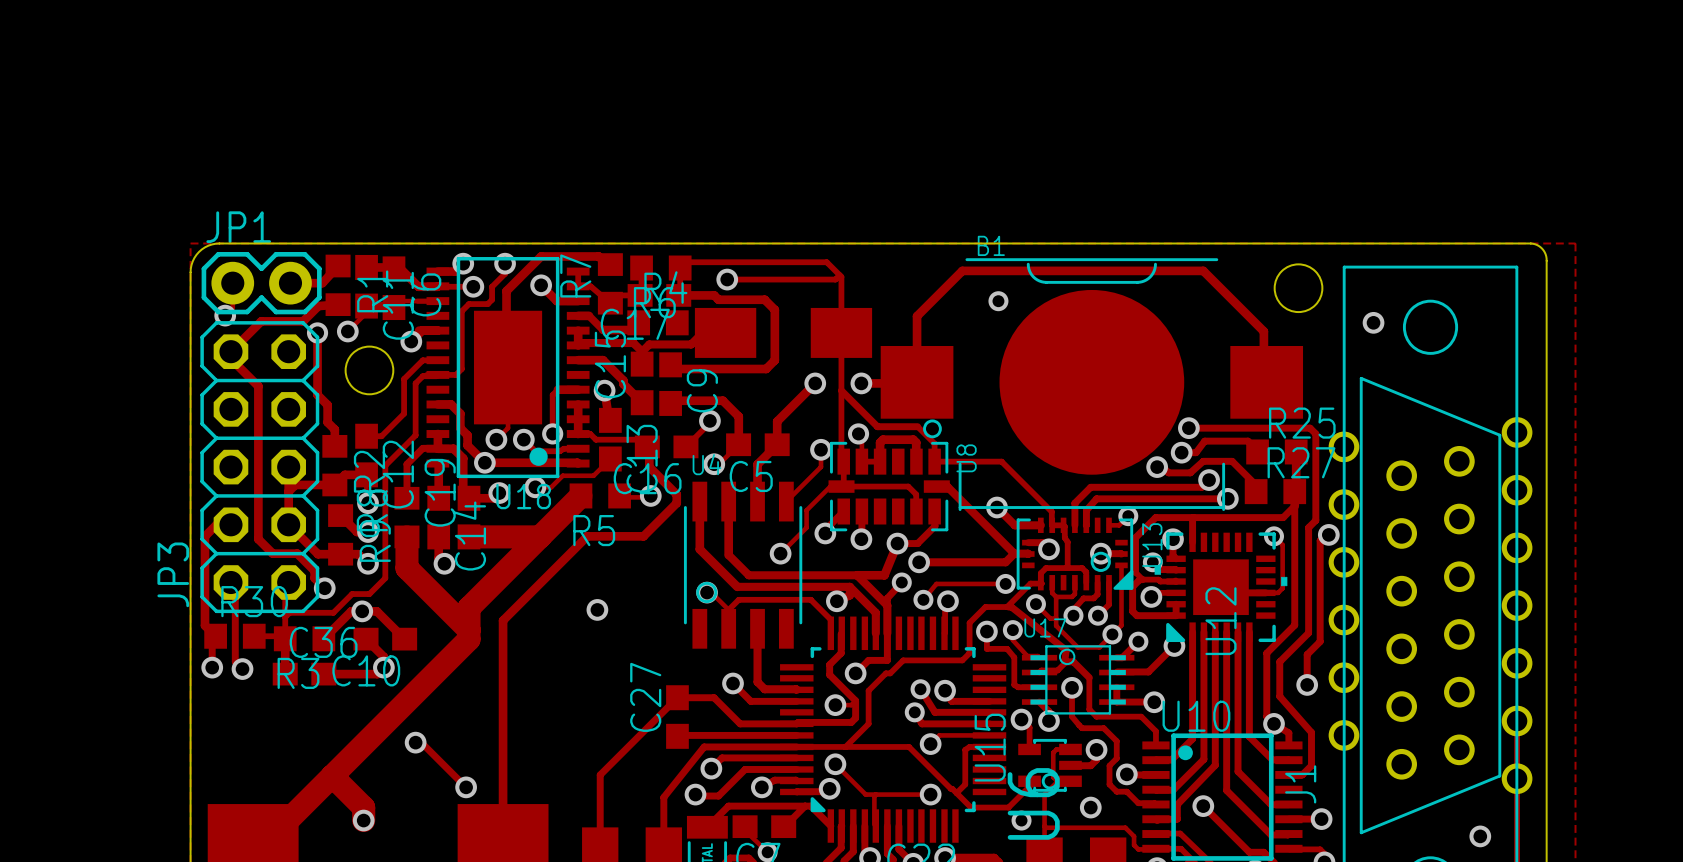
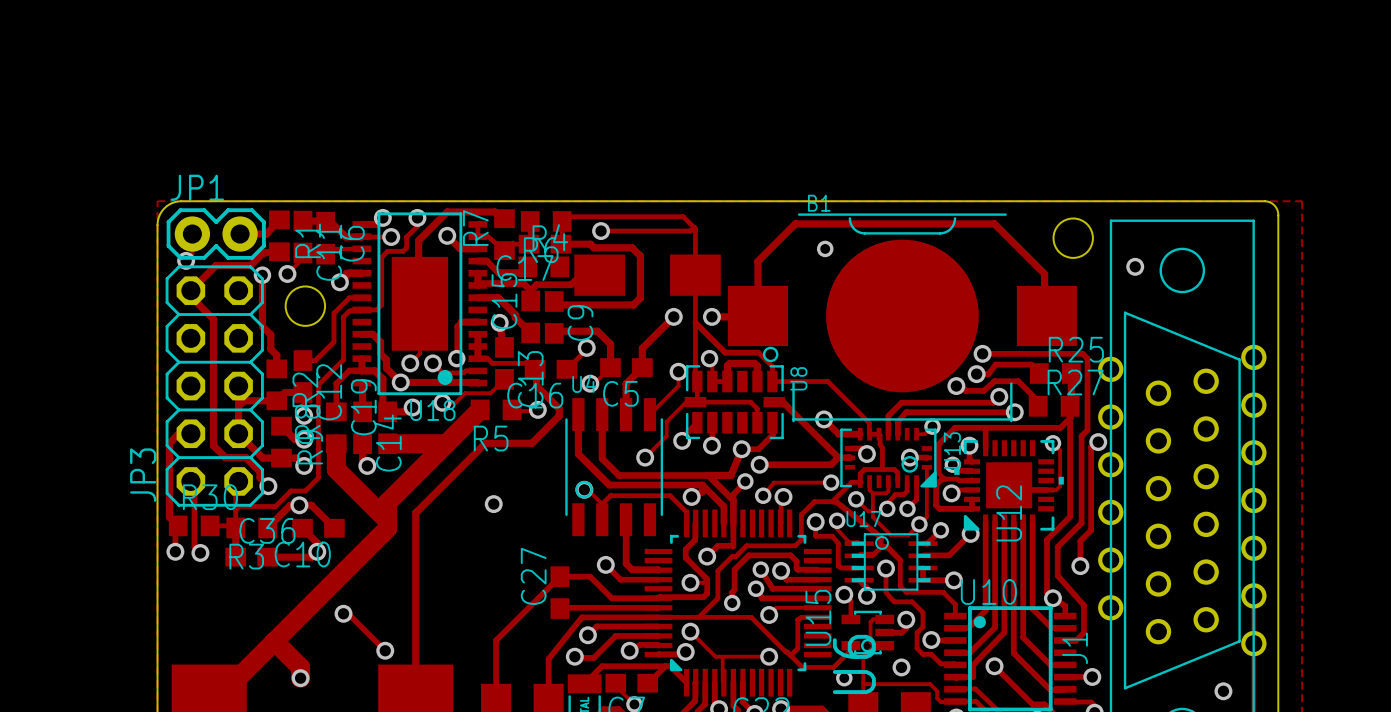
track: none -> (817, 570) (797, 569) (796, 561) (790, 555) (748, 555) (734, 569) (732, 603)
via: none -> (732, 603)

